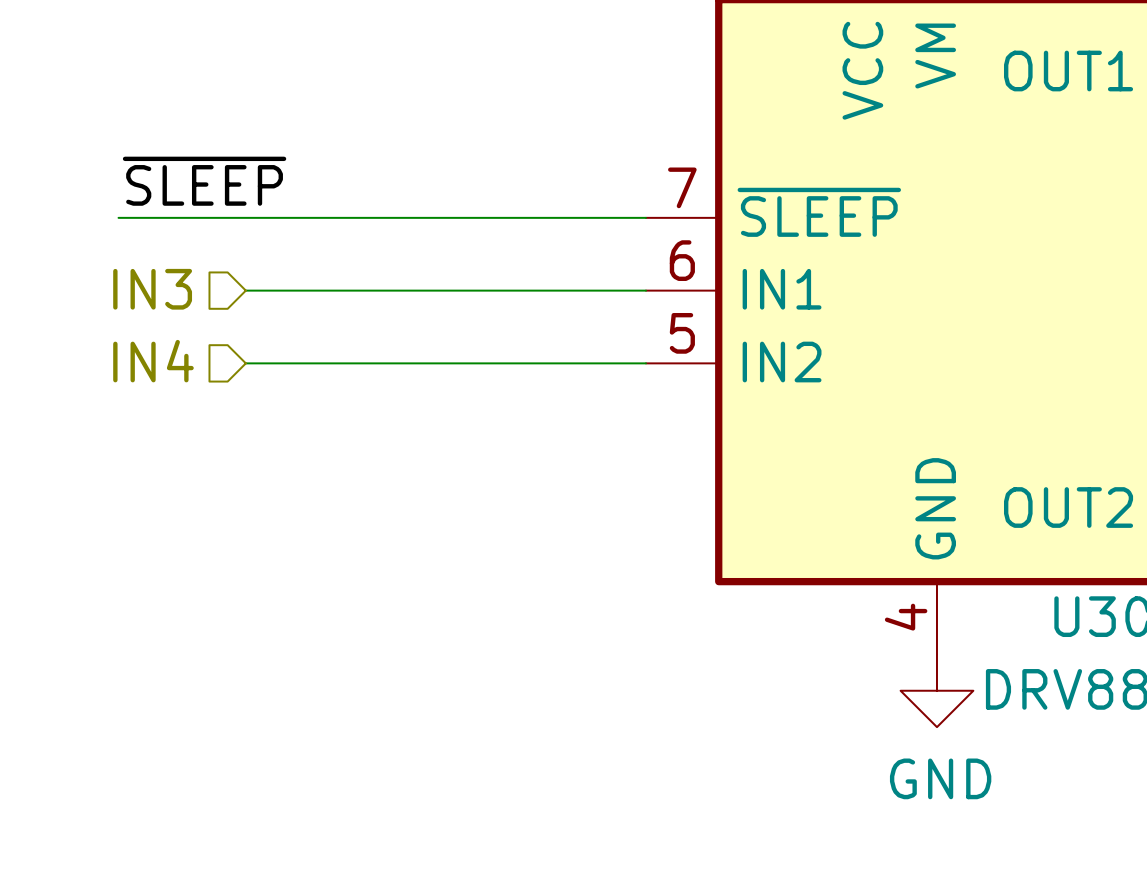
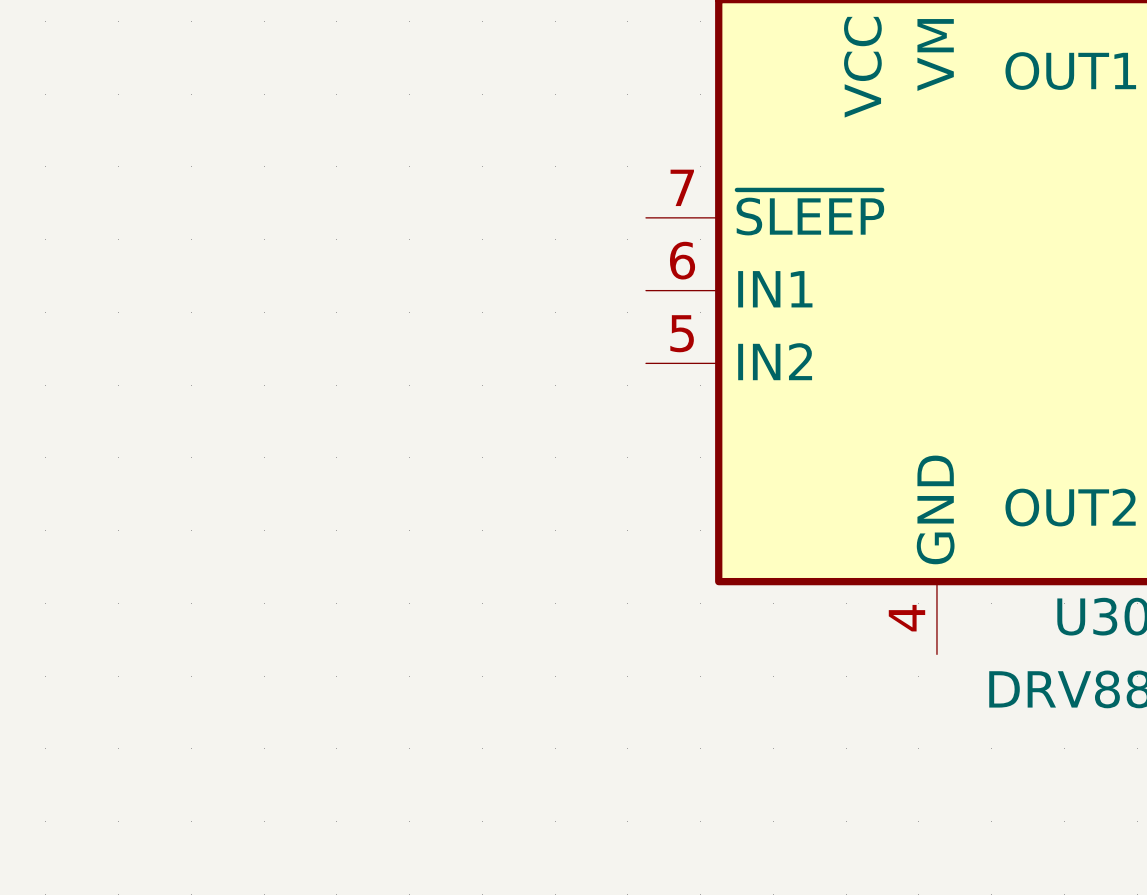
label: ~{SLEEP} (204, 181) -> none
wire: (118, 217) (645, 217) -> none
hierarchical label: IN3 (152, 289) -> none
wire: (245, 290) (645, 290) -> none
hierarchical label: IN4 (153, 361) -> none
wire: (245, 363) (645, 363) -> none
power symbol: GND (936, 690) -> none

